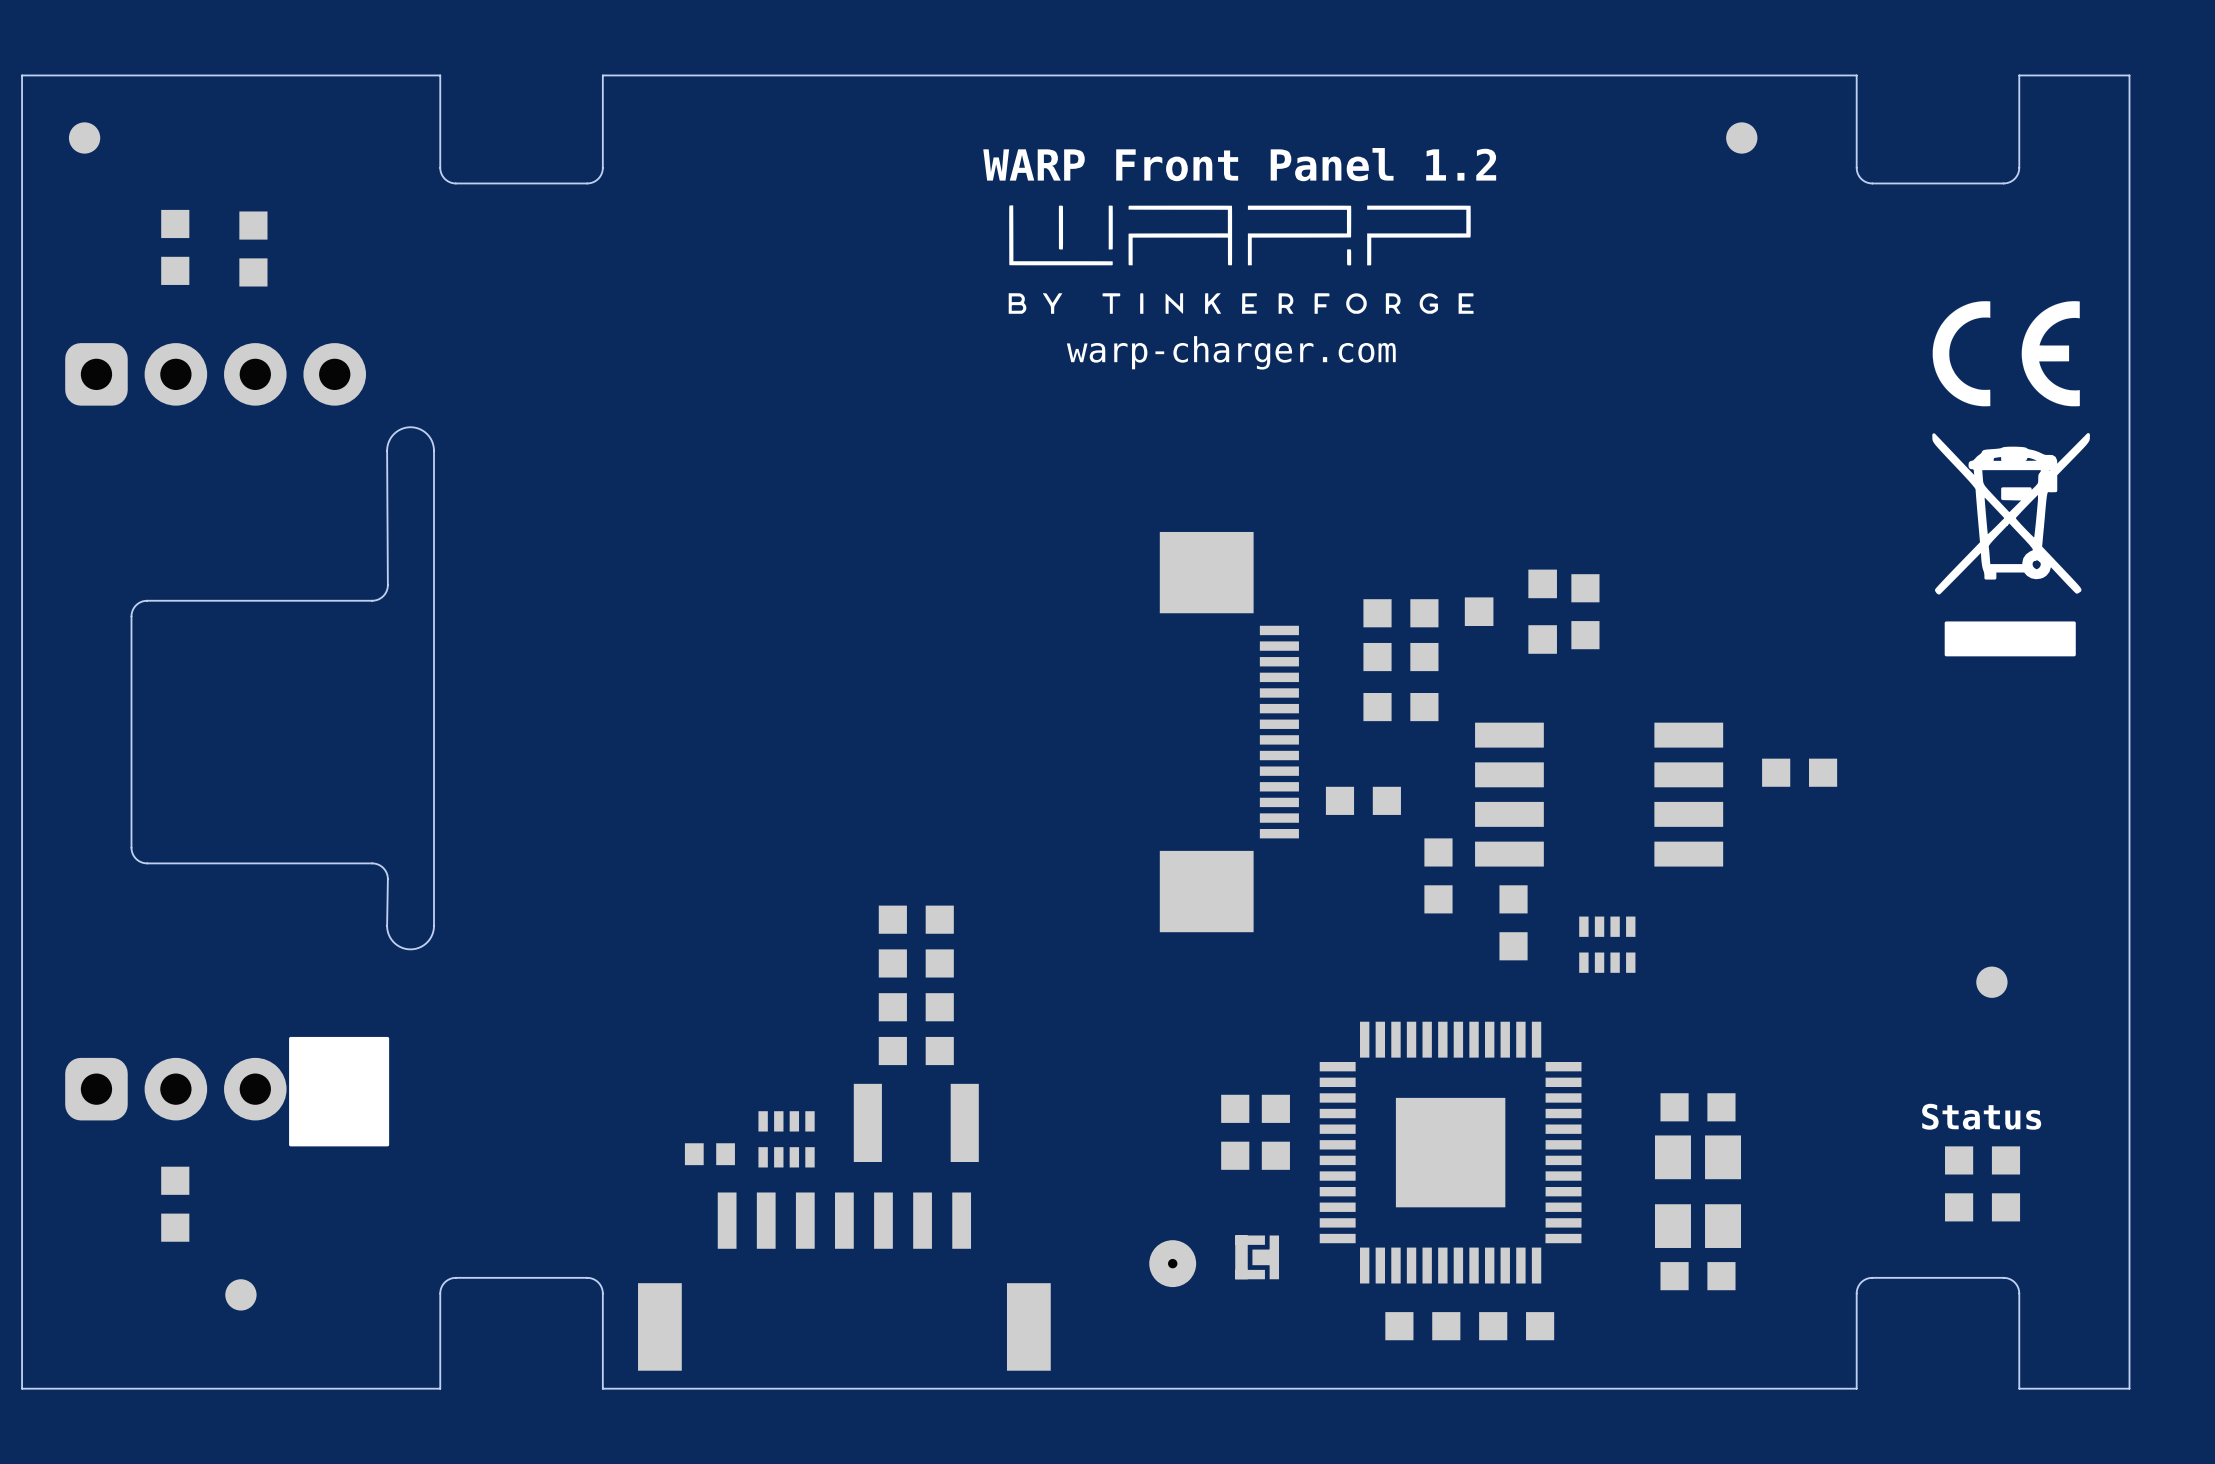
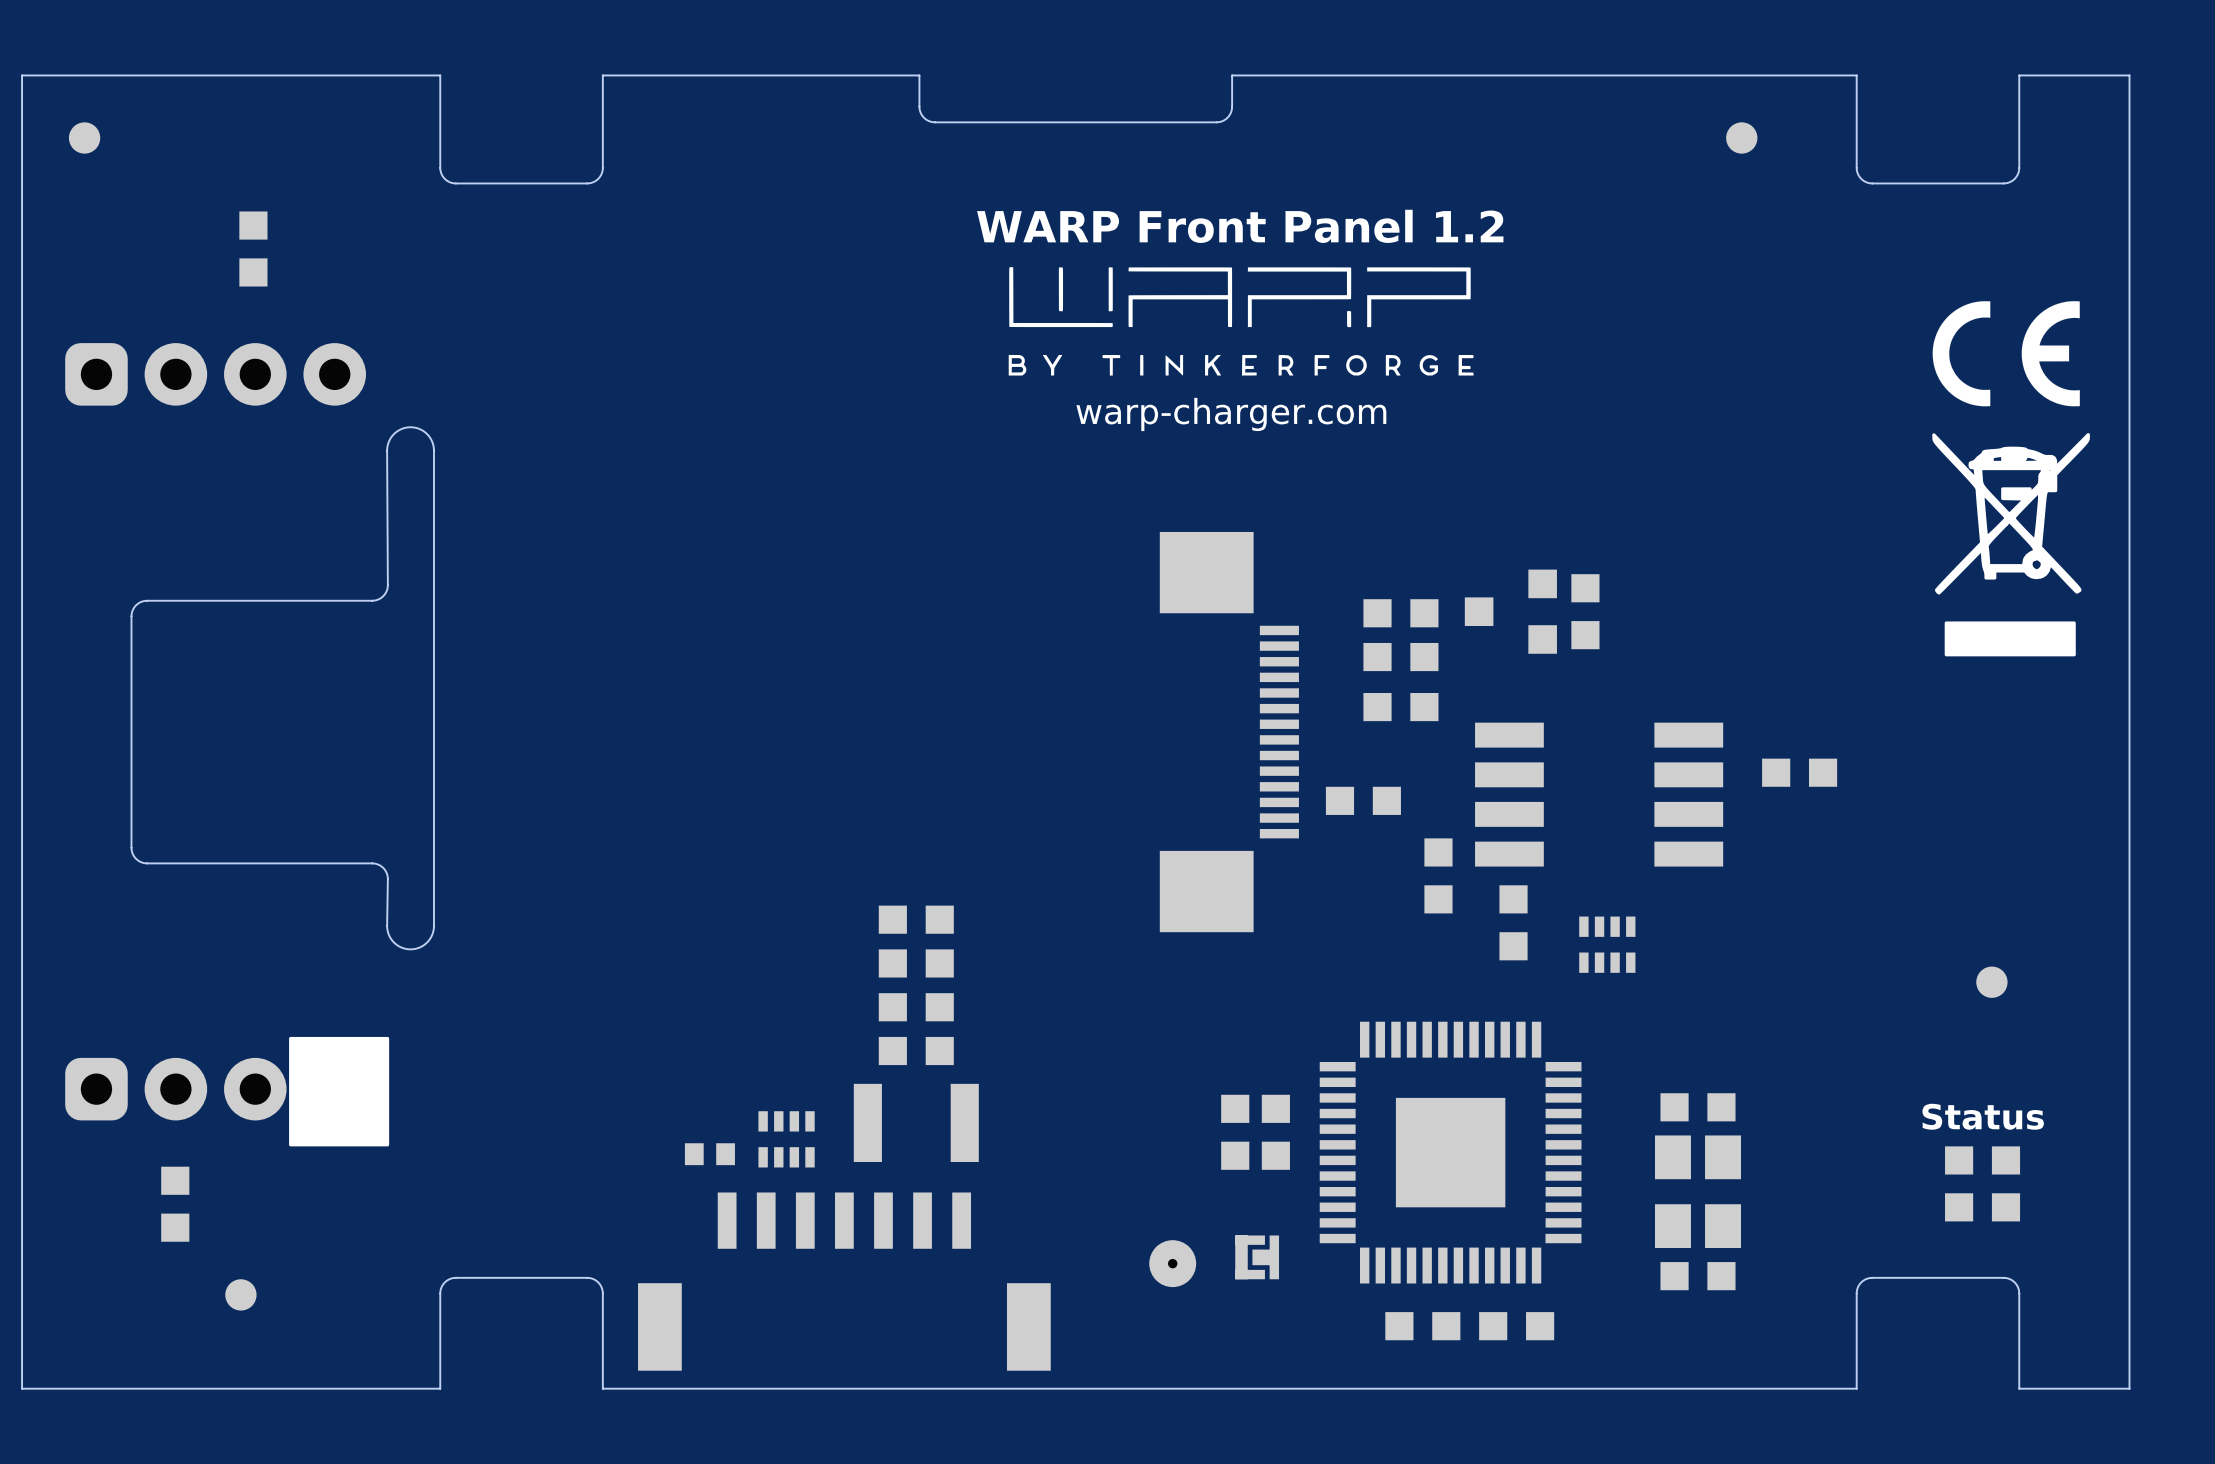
board edge: (919, 75) (1232, 75) -> (919, 75) (919, 110) (925, 119) (935, 122) (1218, 122) (1227, 117) (1231, 110) (1232, 75)
text position: WARP Front Panel 1.2 (1239, 164) -> WARP Front Panel 1.2 (1240, 226)
part: (175, 247) -> none
drawing position: (1241, 259) -> (1241, 321)
text position: warp-charger.com (1231, 352) -> warp-charger.com (1231, 414)

